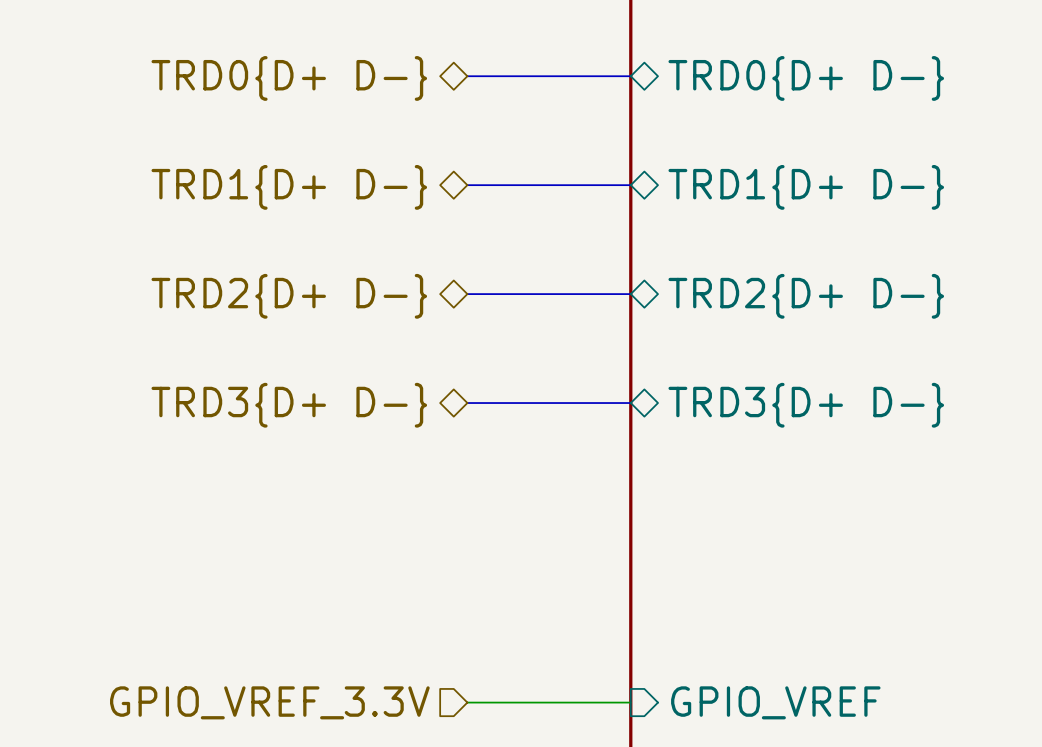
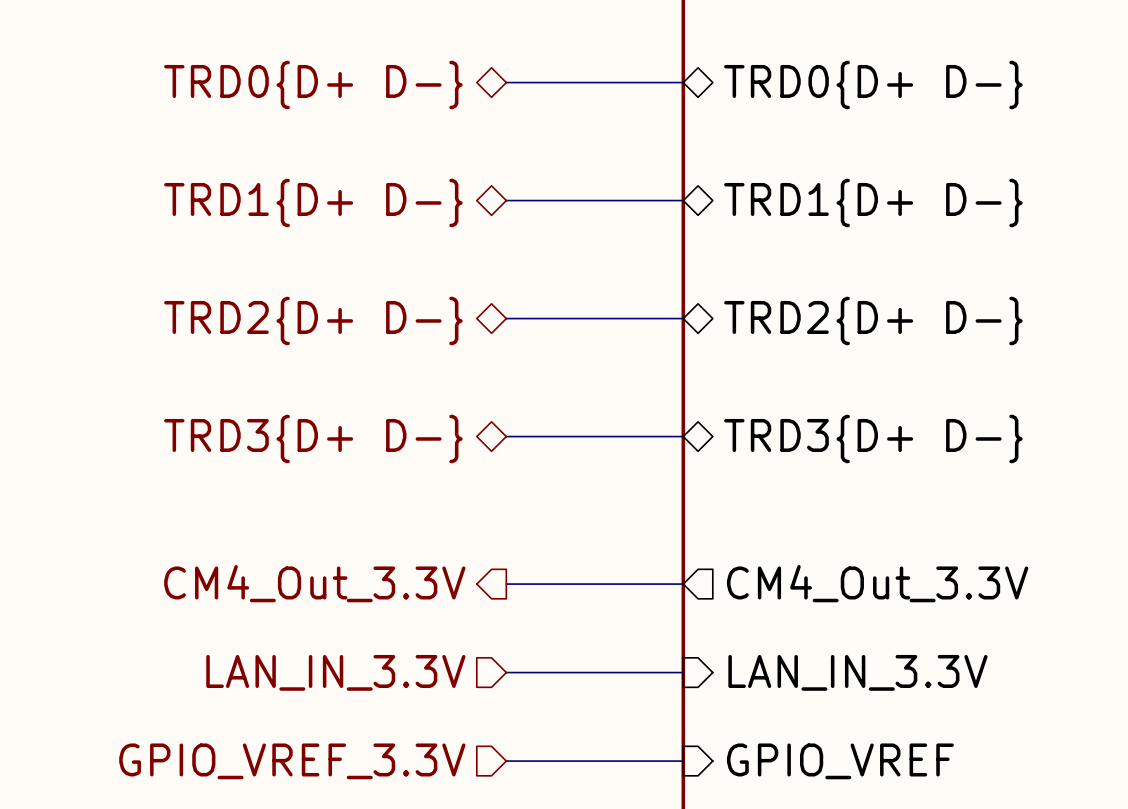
hierarchical label: none -> CM4_Out_3.3V (314, 583)
sheet pin: none -> CM4_Out_3.3V (877, 583)
wire: none -> (506, 584) (683, 584)
wire: none -> (506, 672) (683, 672)
hierarchical label: none -> LAN_IN_3.3V (335, 672)
sheet pin: none -> LAN_IN_3.3V (857, 672)

